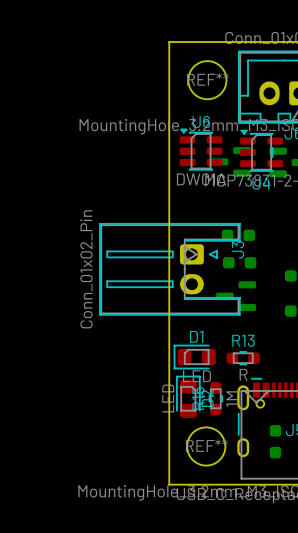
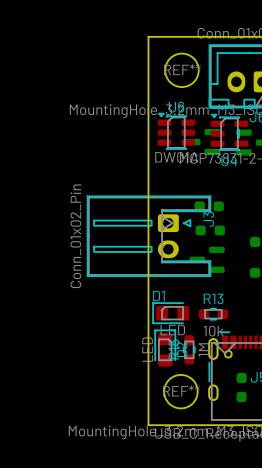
D1 name position: D1 (196, 336) -> D1 (158, 296)
R13 value: R (243, 374) -> 10k (213, 331)

